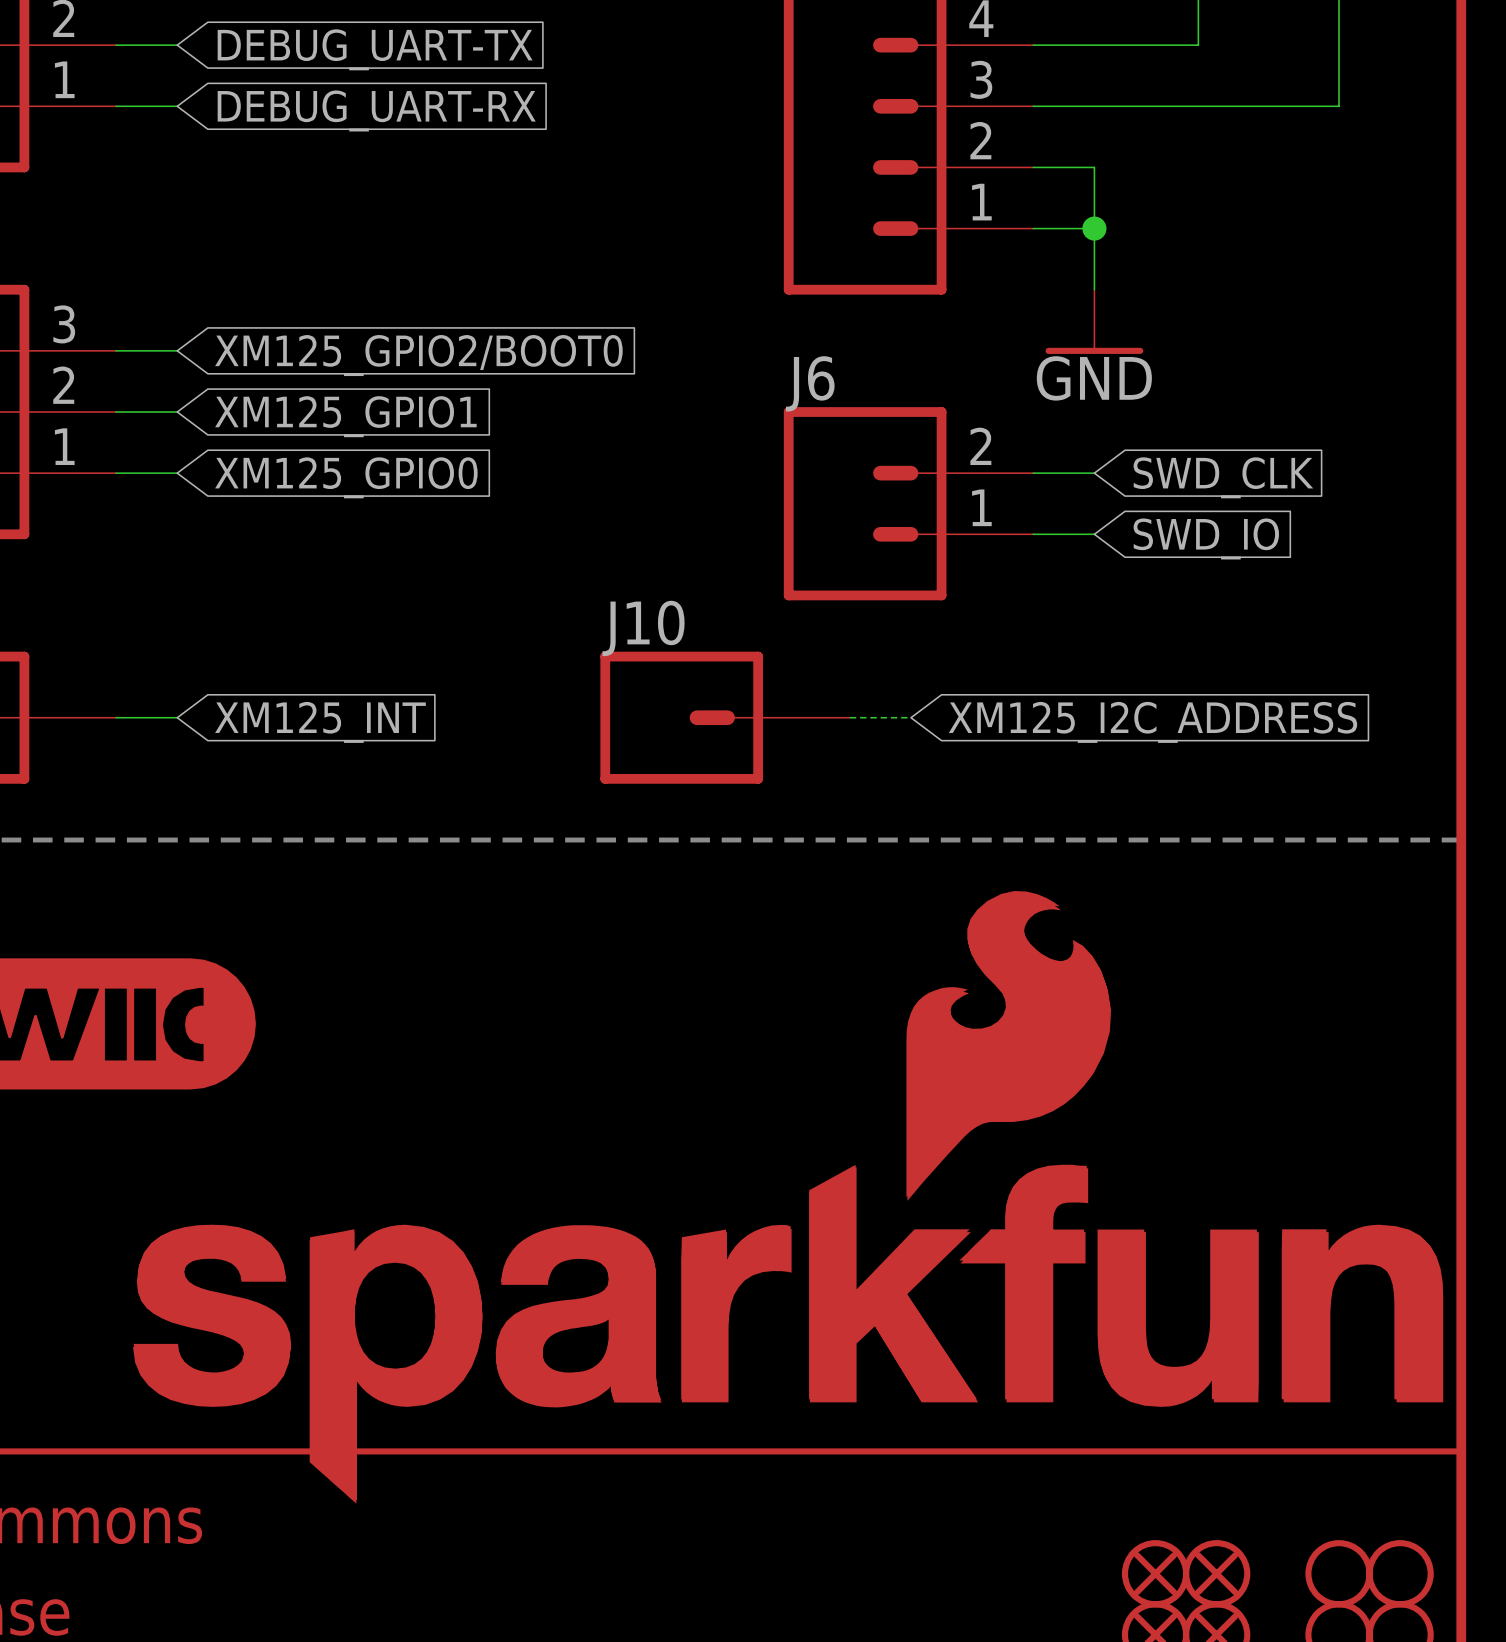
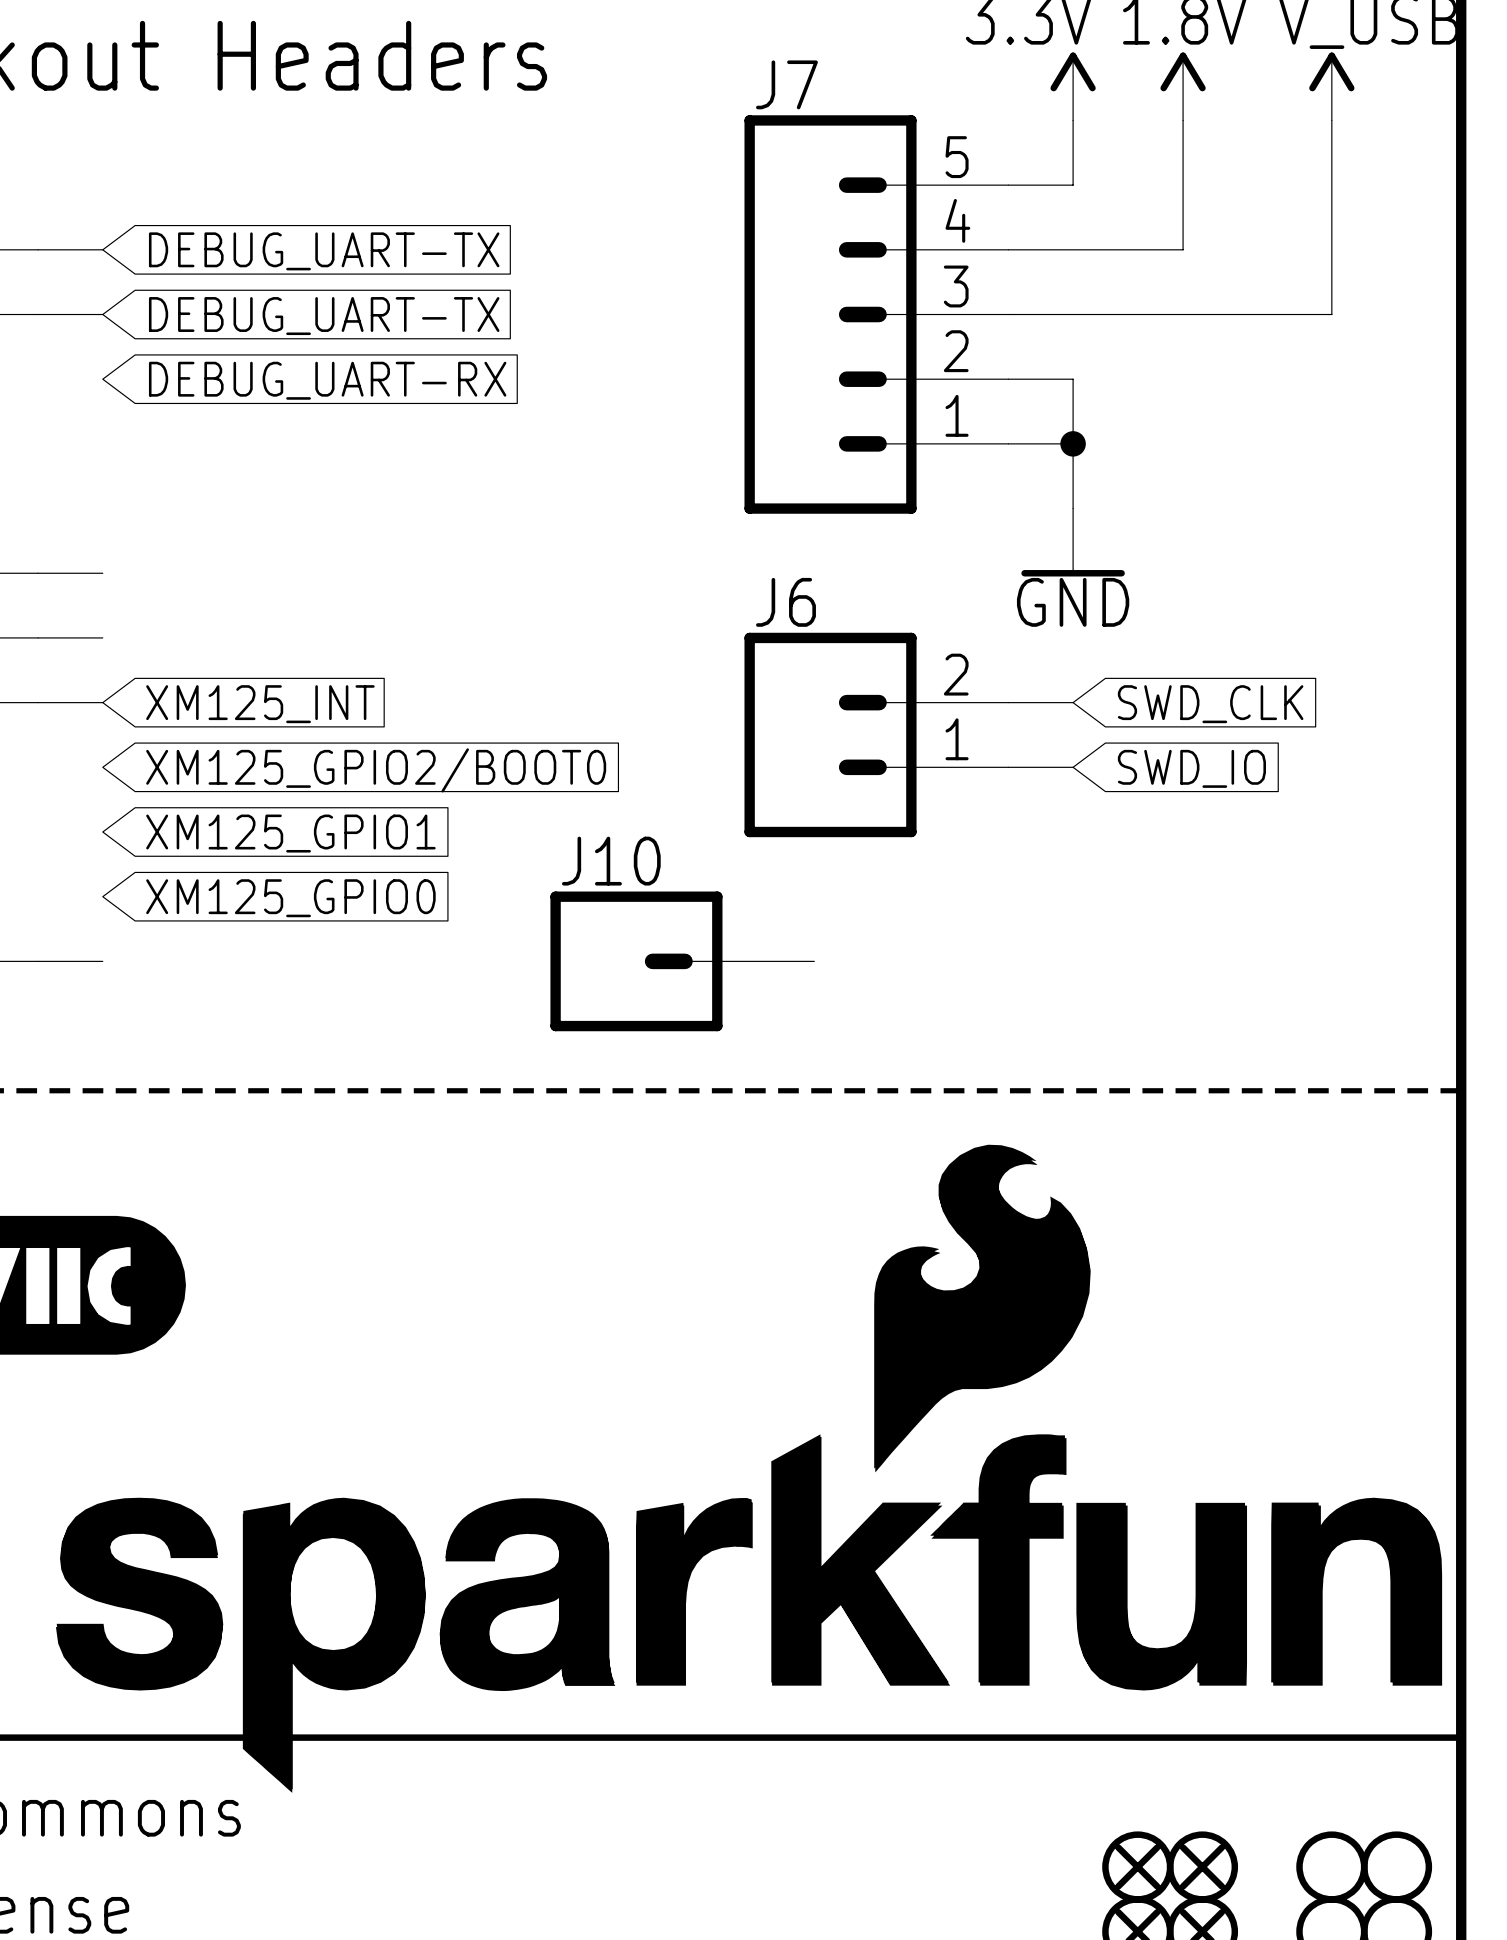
global label: DEBUG_UART-RX (376, 110) -> DEBUG_UART-TX (324, 316)
global label: none -> DEBUG_UART-RX (327, 380)
global label position: XM125_GPIO2/BOOT0 (418, 355) -> XM125_GPIO2/BOOT0 (376, 770)
global label position: XM125_GPIO1 (345, 416) -> XM125_GPIO1 (290, 833)
global label: XM125_GPIO0 (346, 477) -> XM125_INT (260, 704)
wire: (849, 717) (910, 717) -> none
global label: XM125_INT (320, 722) -> XM125_GPIO0 (290, 898)
global label: XM125_I2C_ADDRESS (1152, 722) -> none

